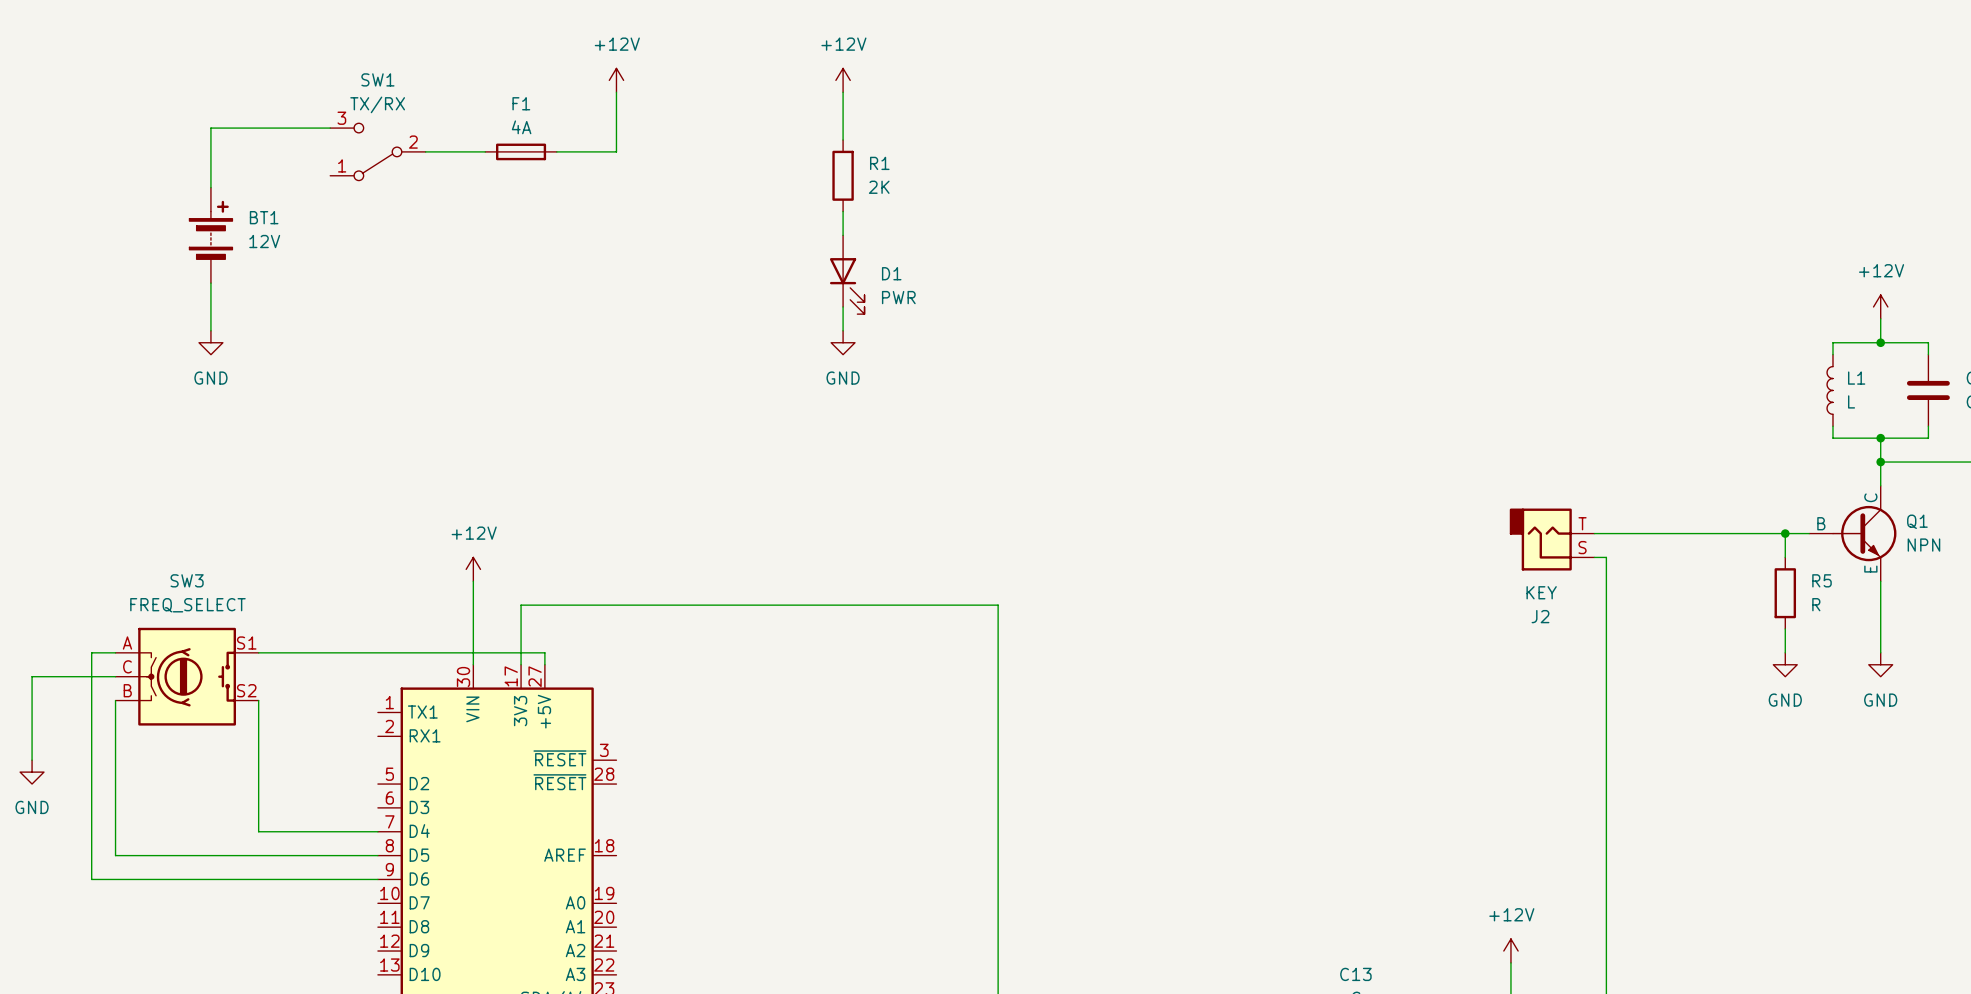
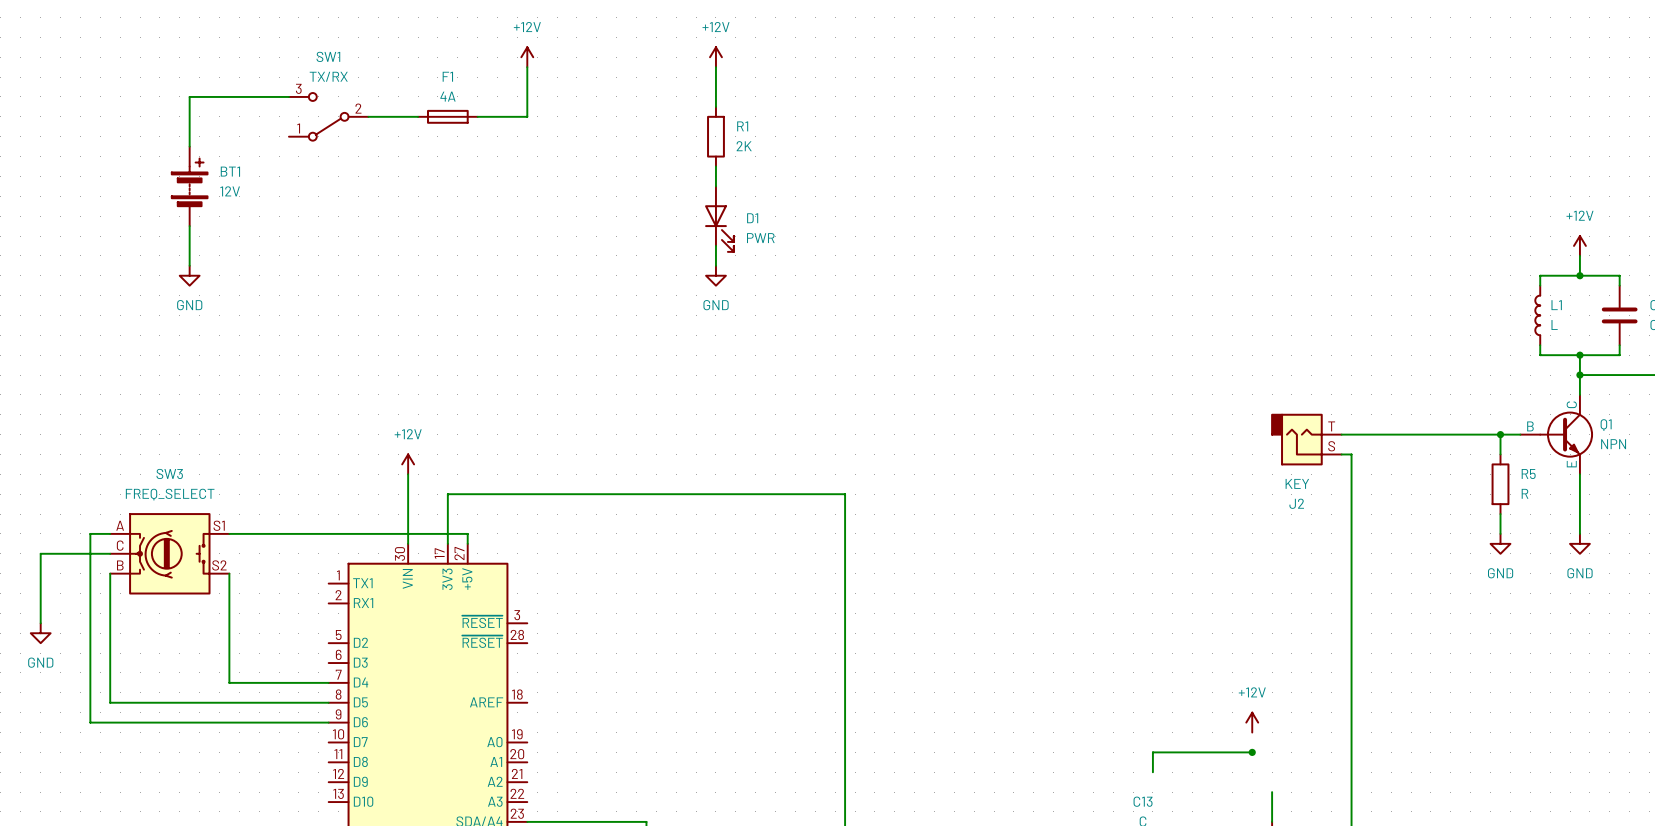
wire: none -> (1252, 752) (1152, 752) (1152, 772)
junction: none -> (1252, 752)
power symbol position: +12V (1510, 951) -> +12V (1252, 722)

